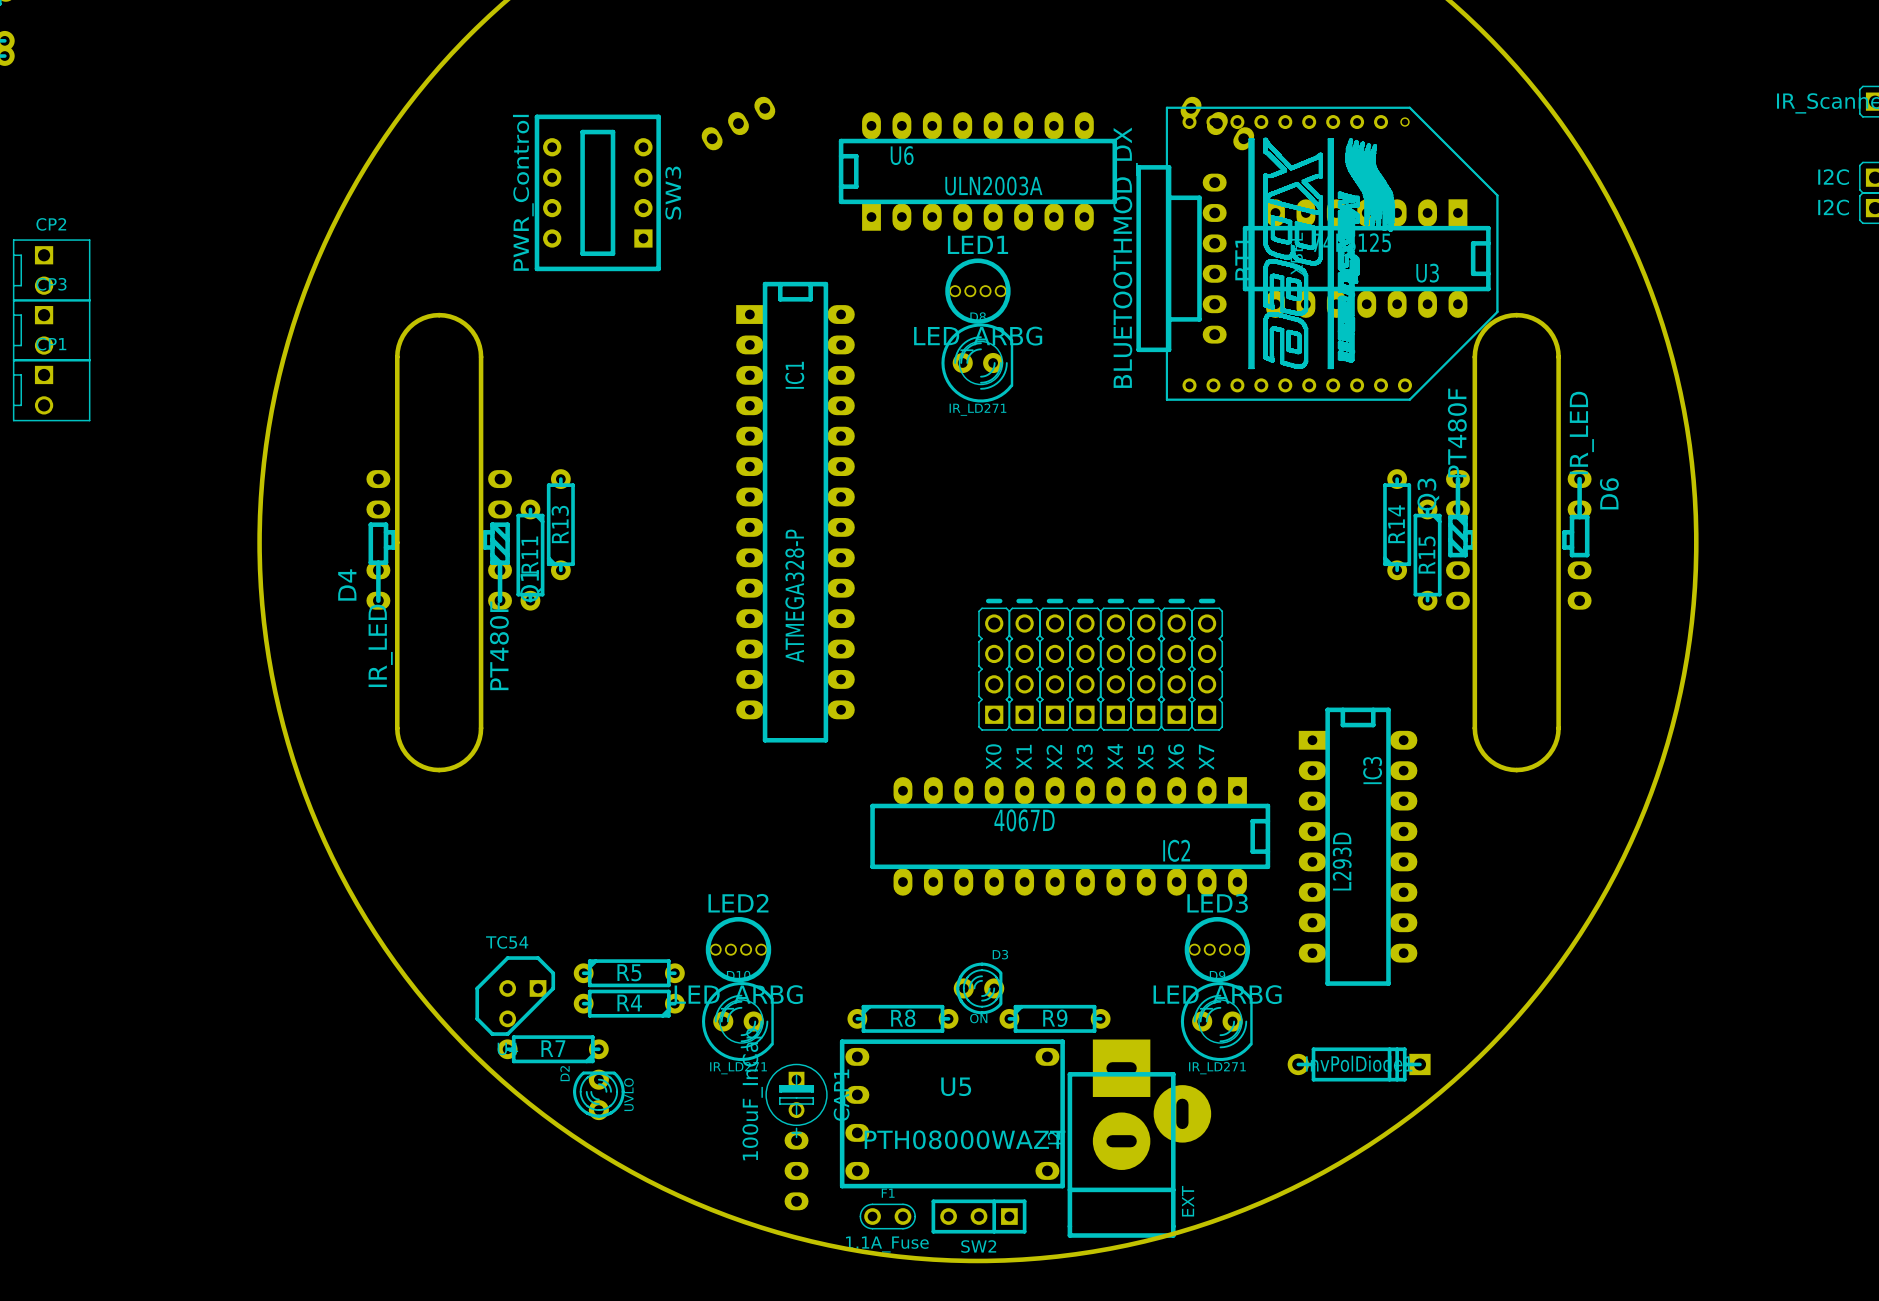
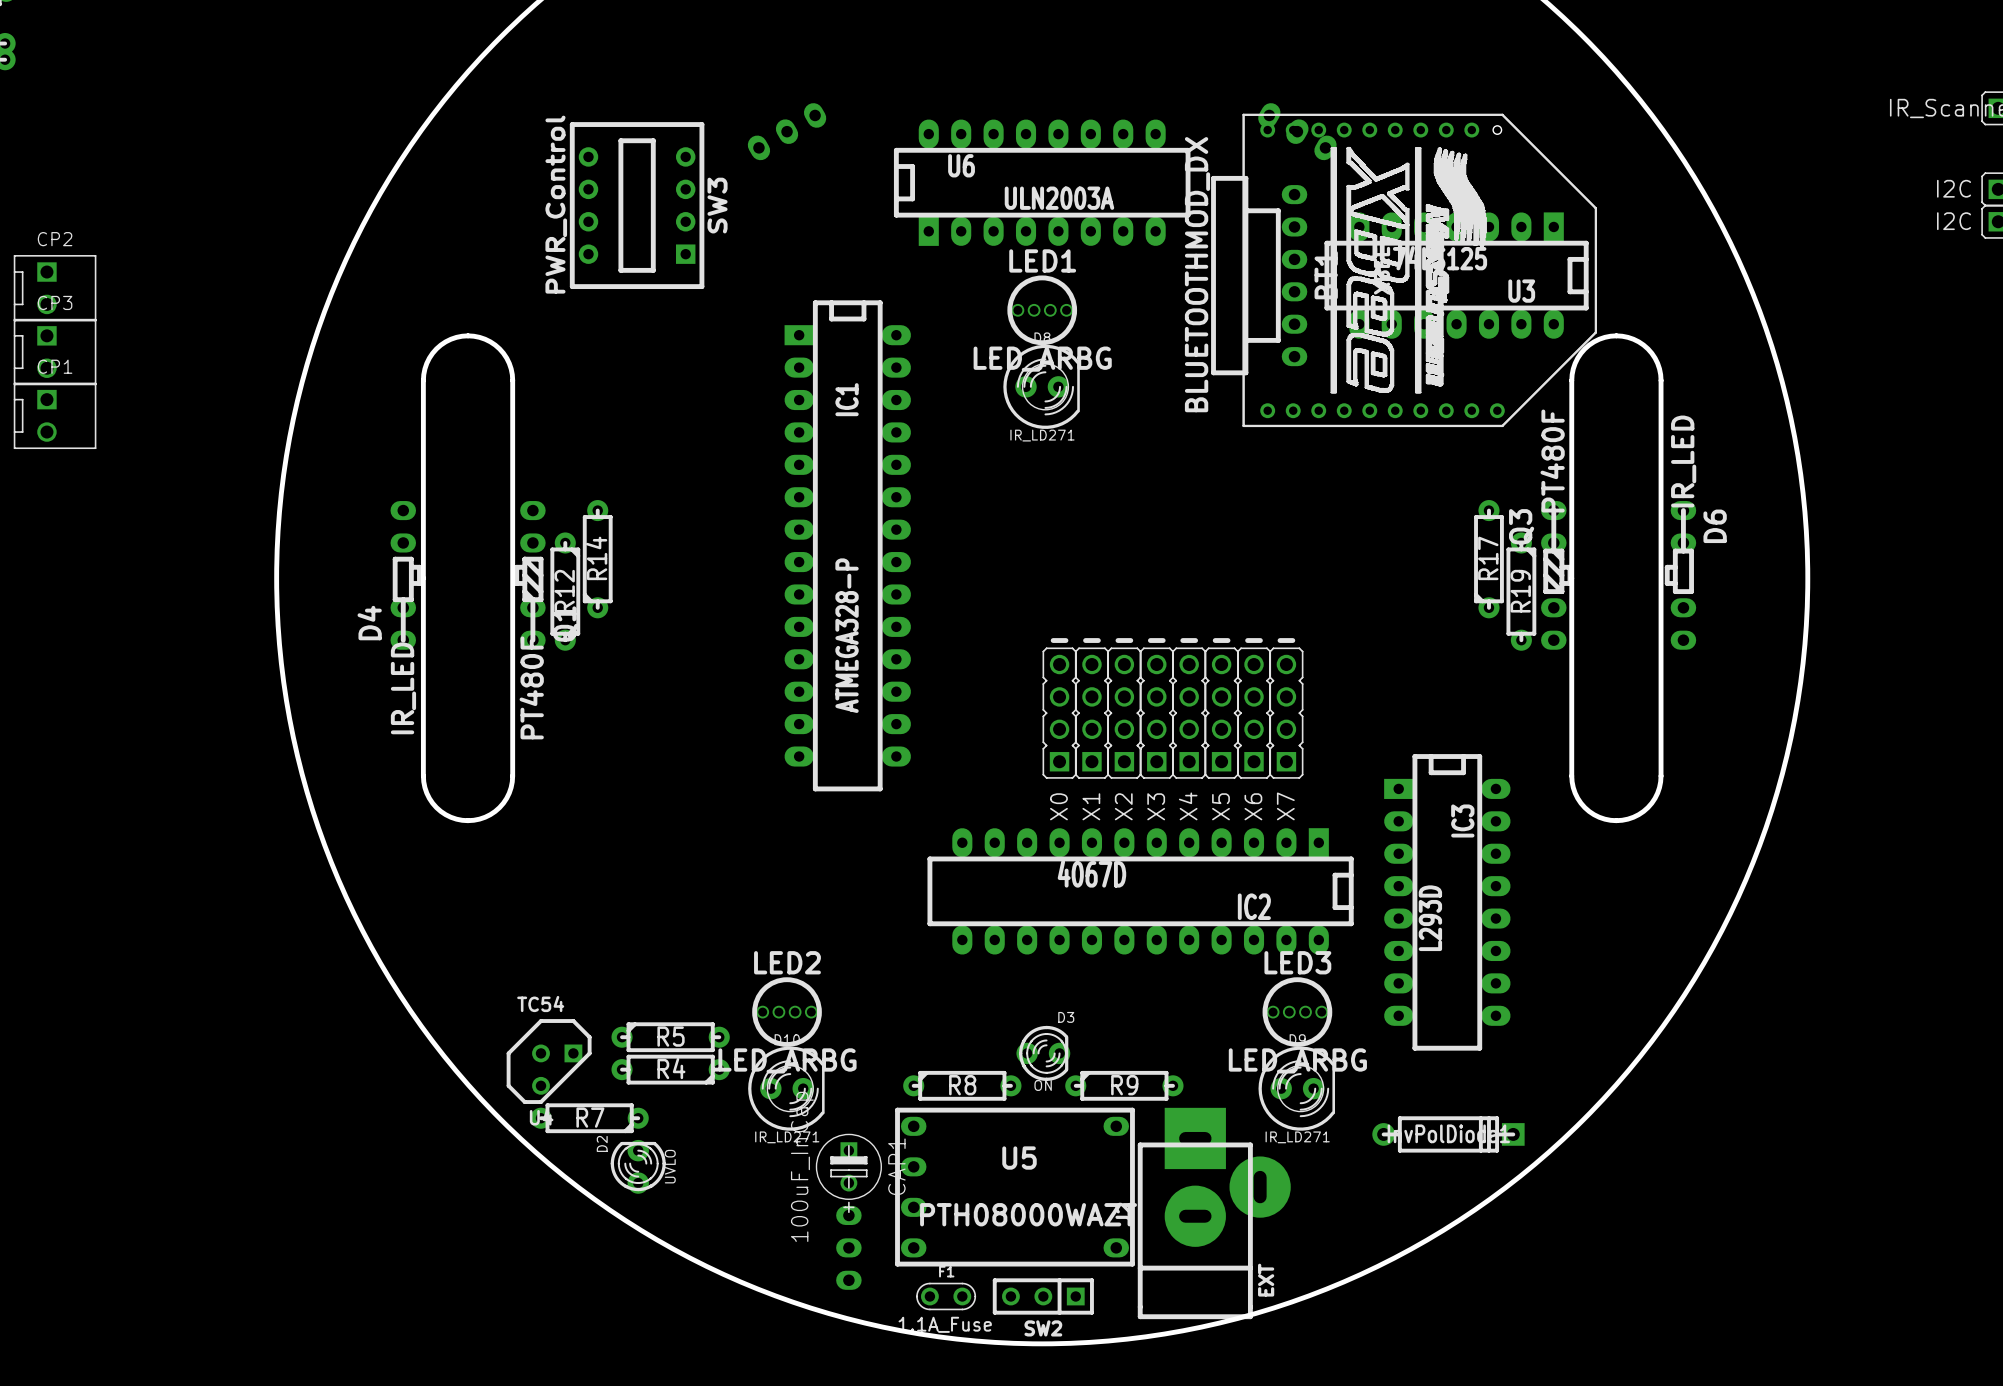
R13 name: R13 (560, 524) -> R14 (596, 558)
R14 name: R14 (1396, 524) -> R17 (1488, 558)
R15 name: R15 (1427, 554) -> R19 (1520, 591)
R11 name: R11 (529, 555) -> R12 (564, 591)

